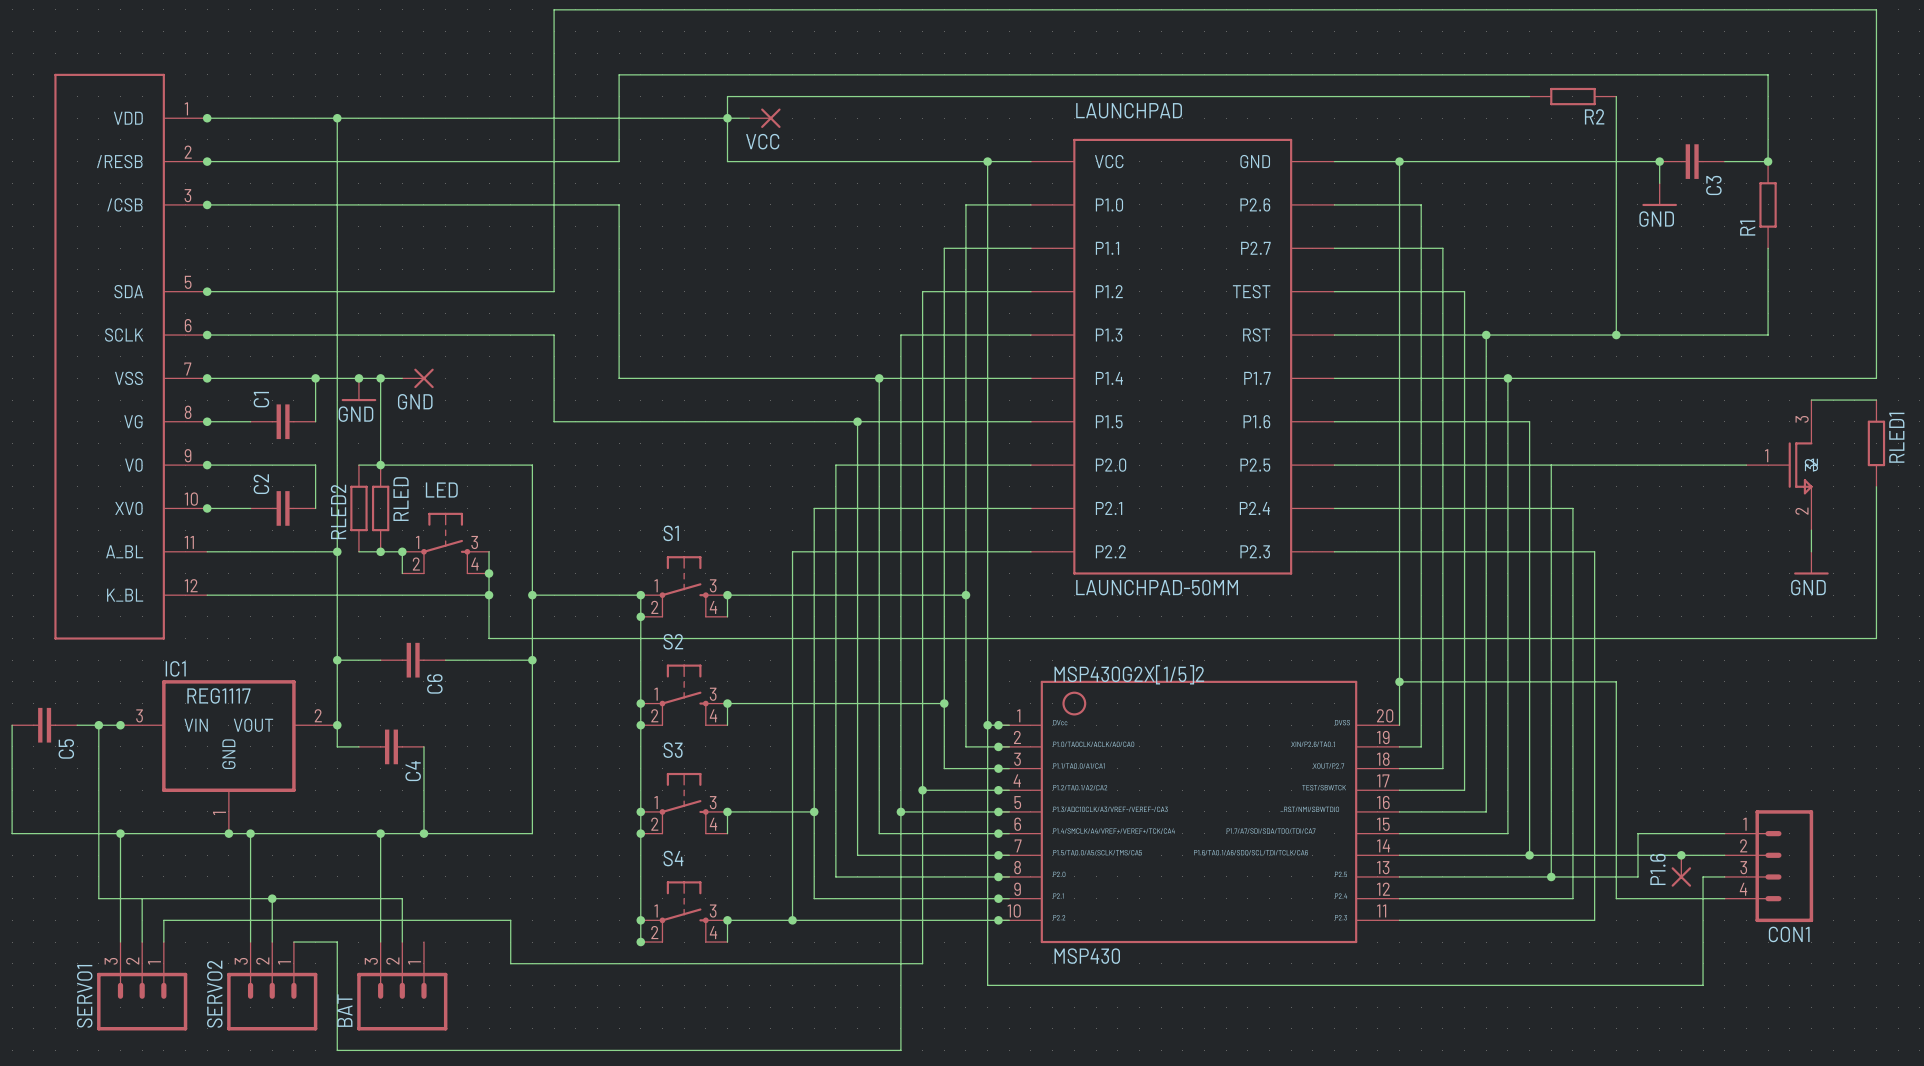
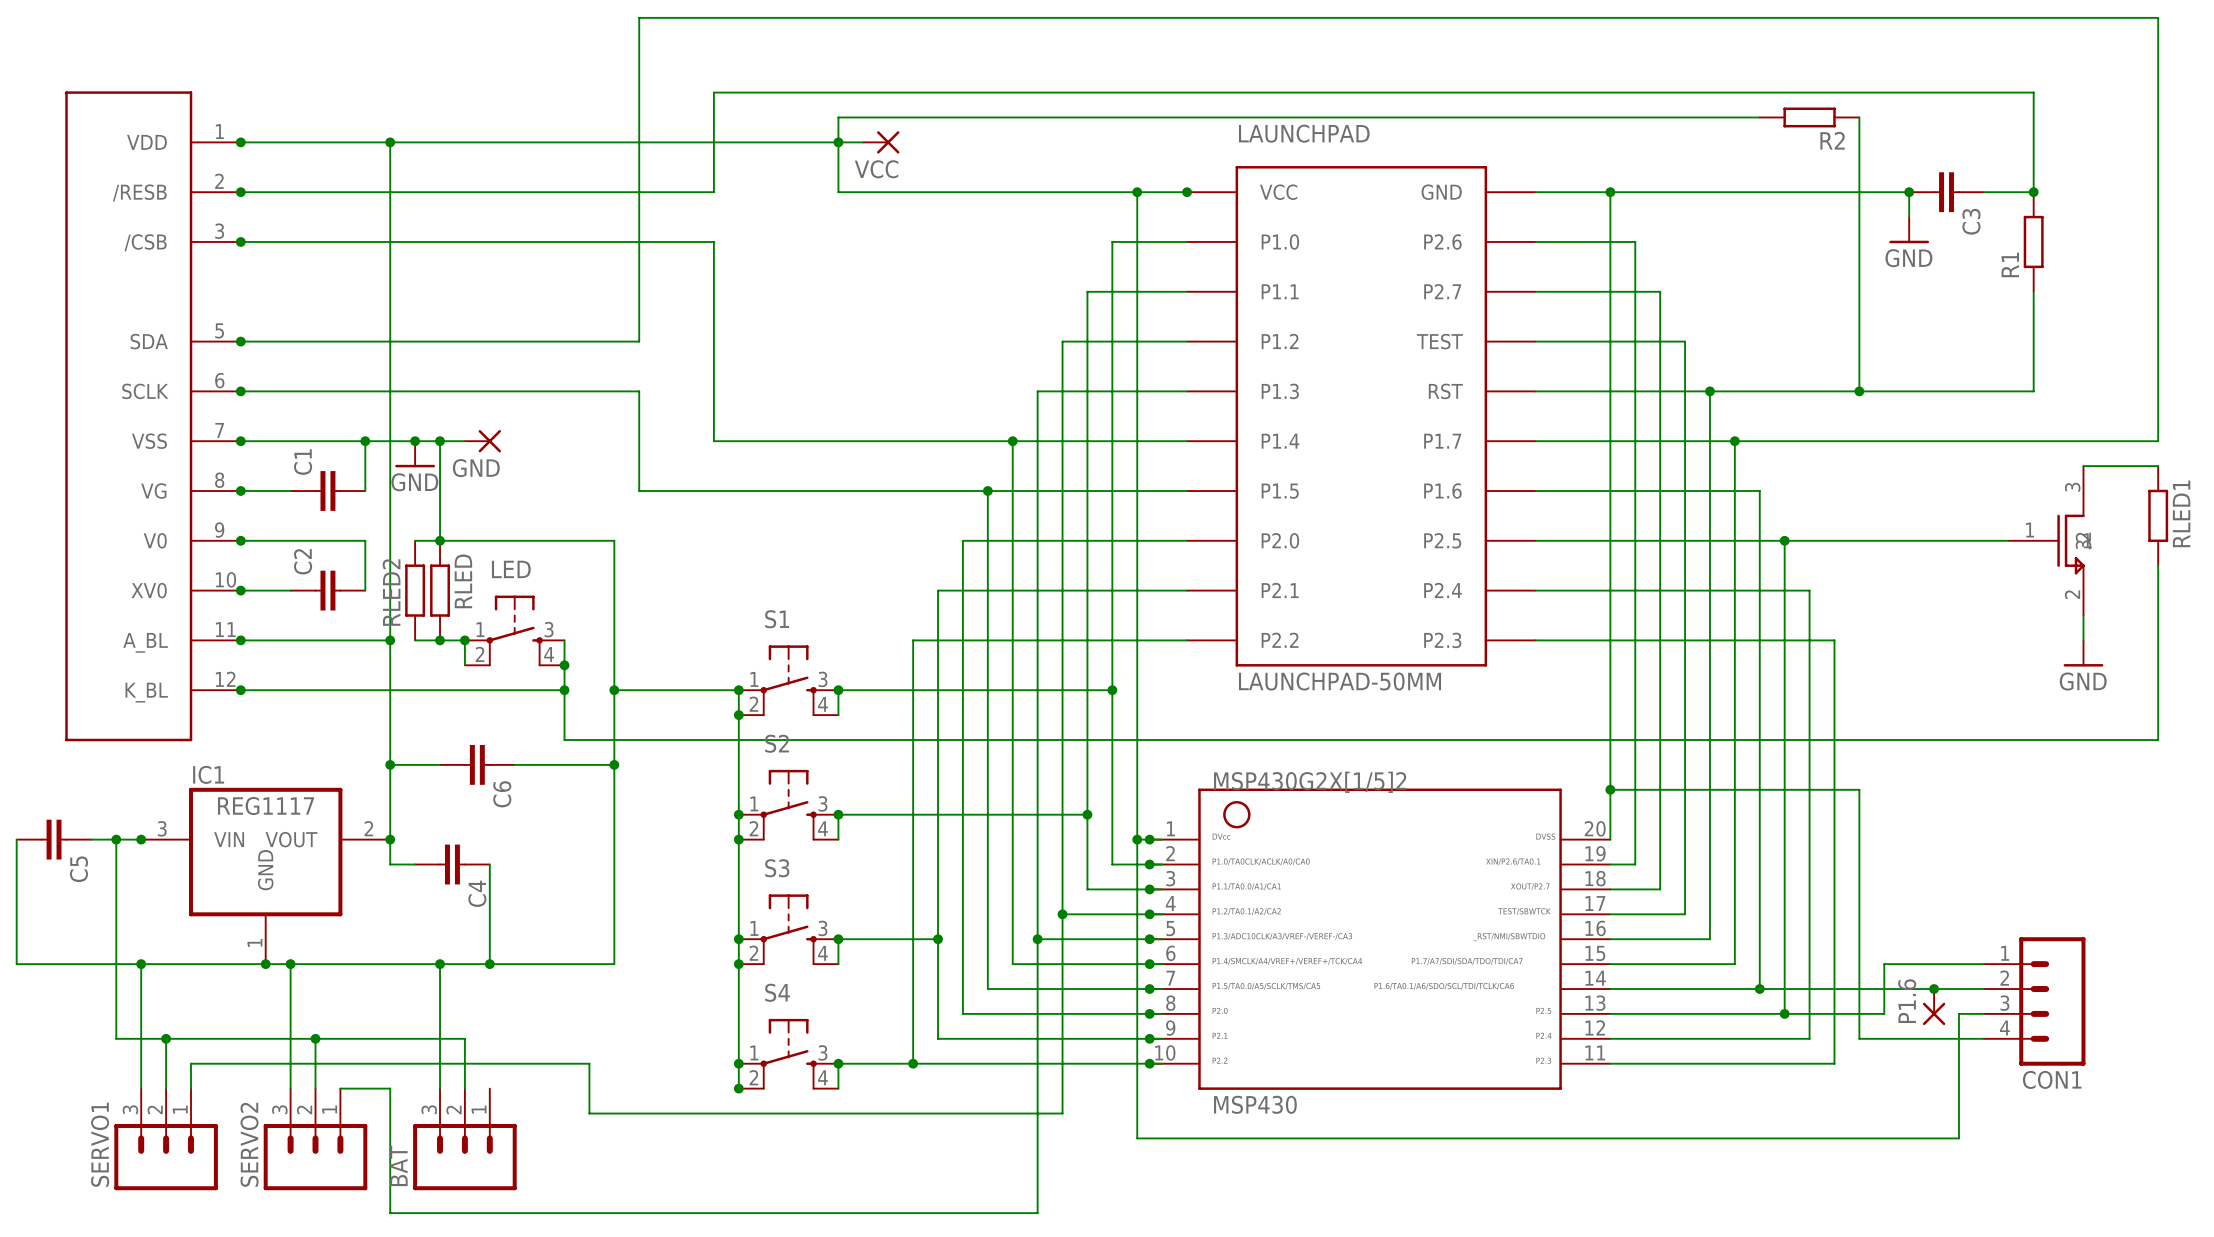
junction: none -> (1187, 192)
junction: none -> (1784, 540)
junction: none -> (240, 640)
junction: none -> (240, 690)
junction: none -> (166, 1038)

